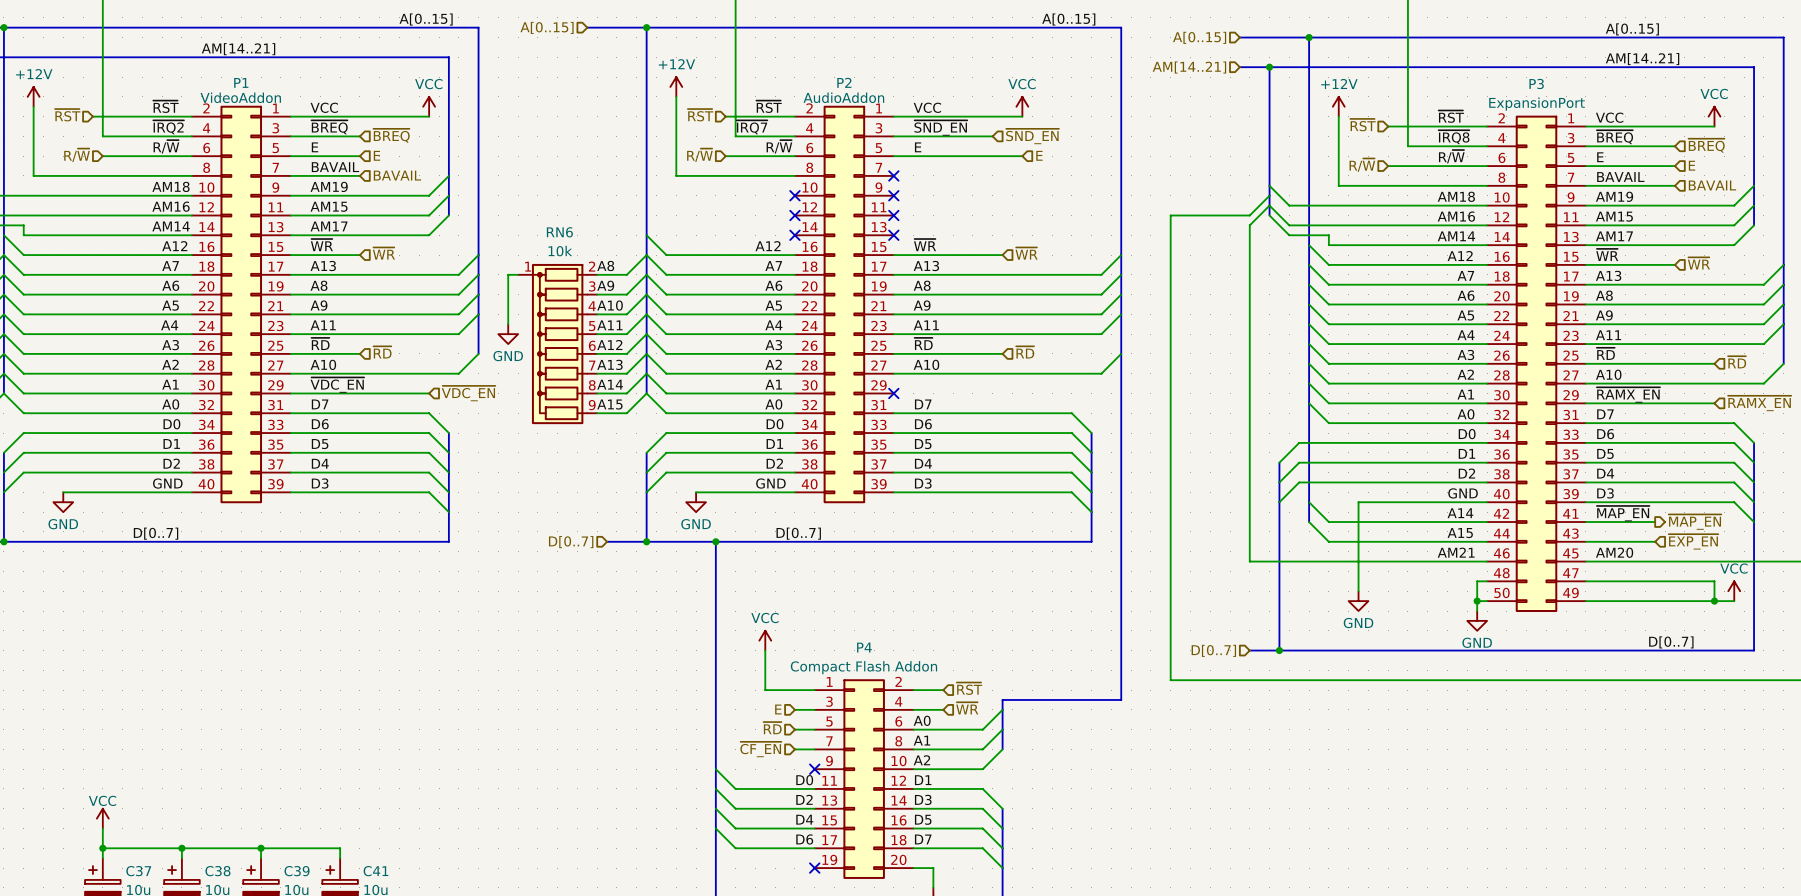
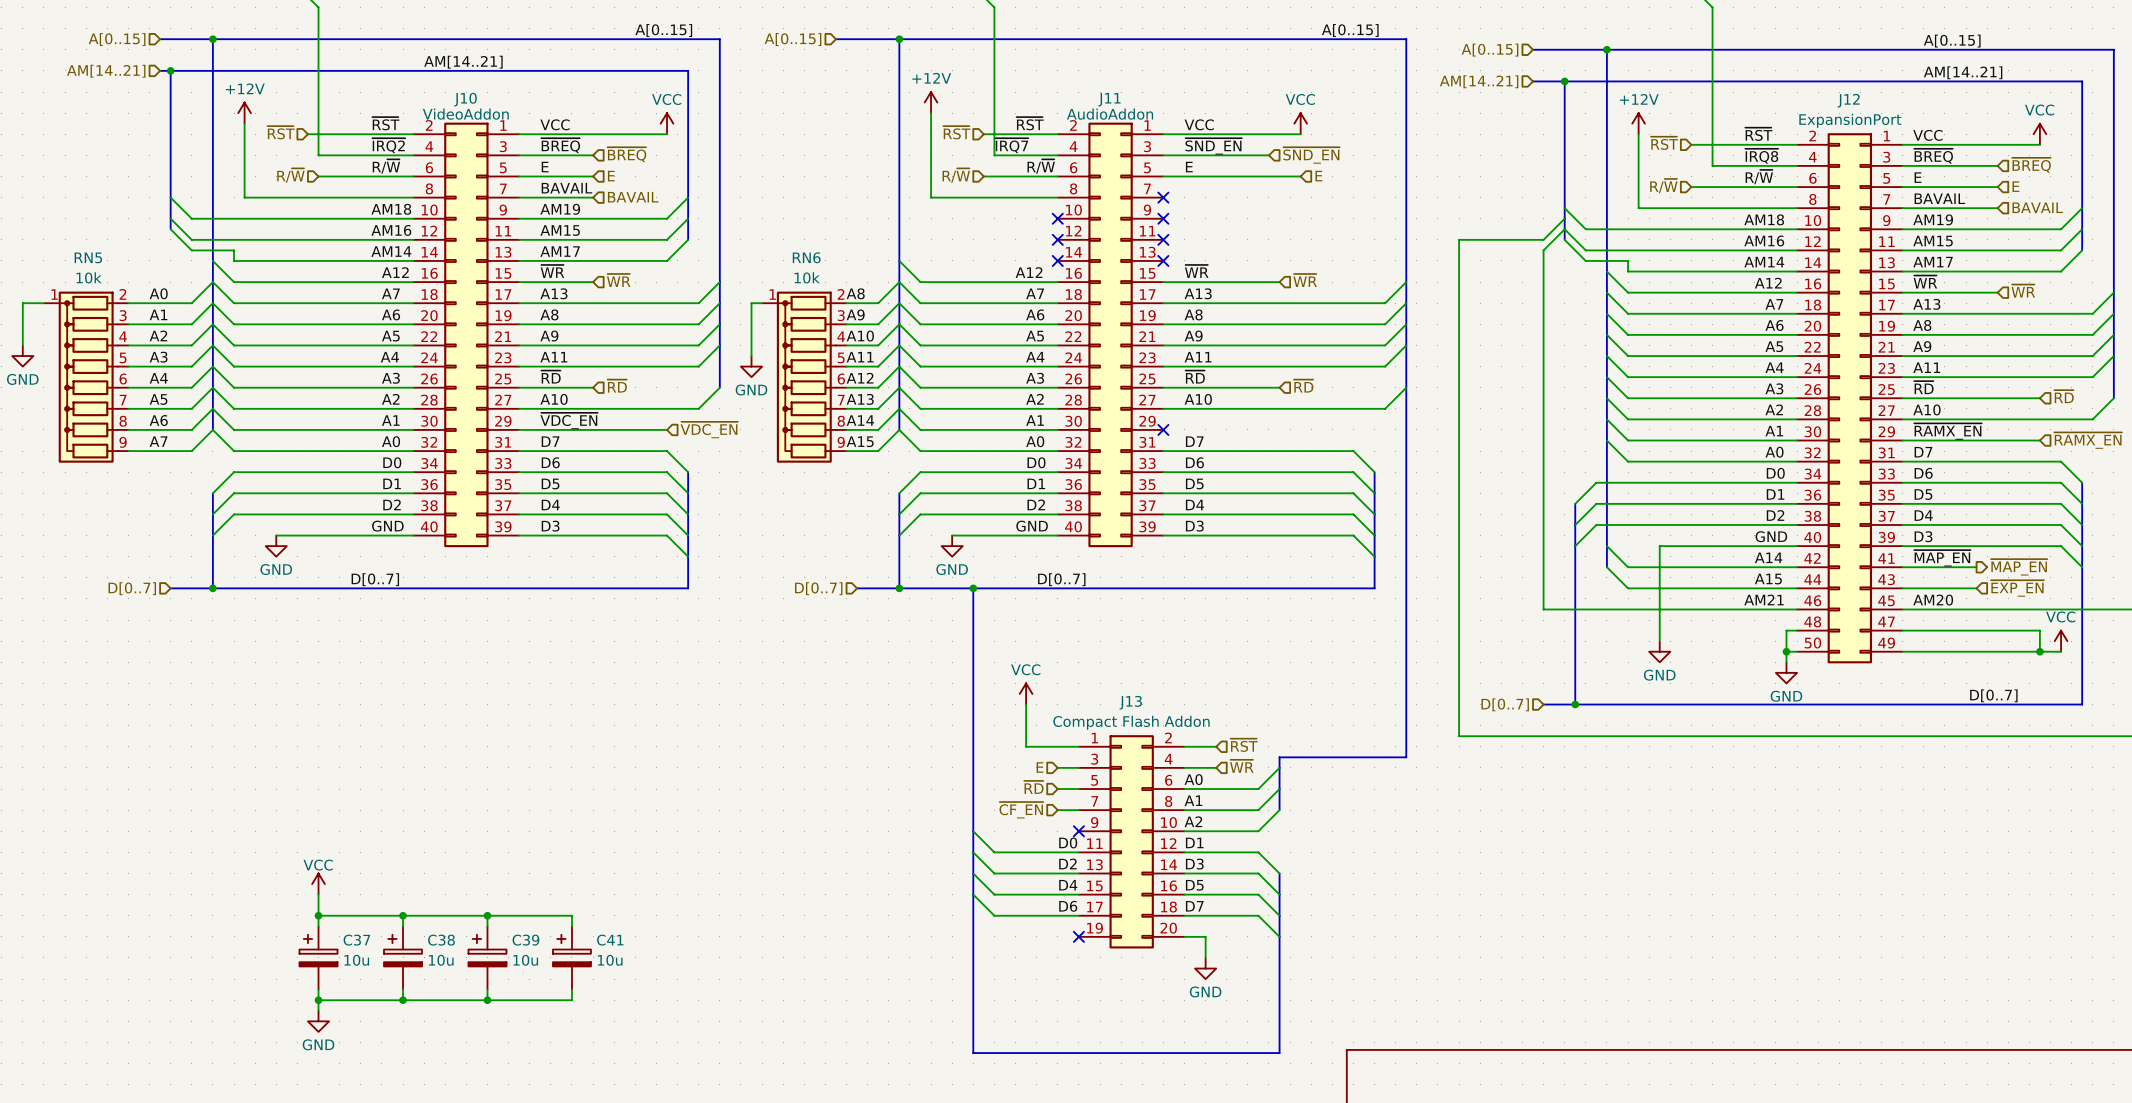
P1 name: P1 (241, 82) -> J10 (465, 99)
P2 name: P2 (844, 82) -> J11 (1109, 99)
P3 name: P3 (1536, 84) -> J12 (1848, 100)
P4 name: P4 (864, 647) -> J13 (1130, 702)

